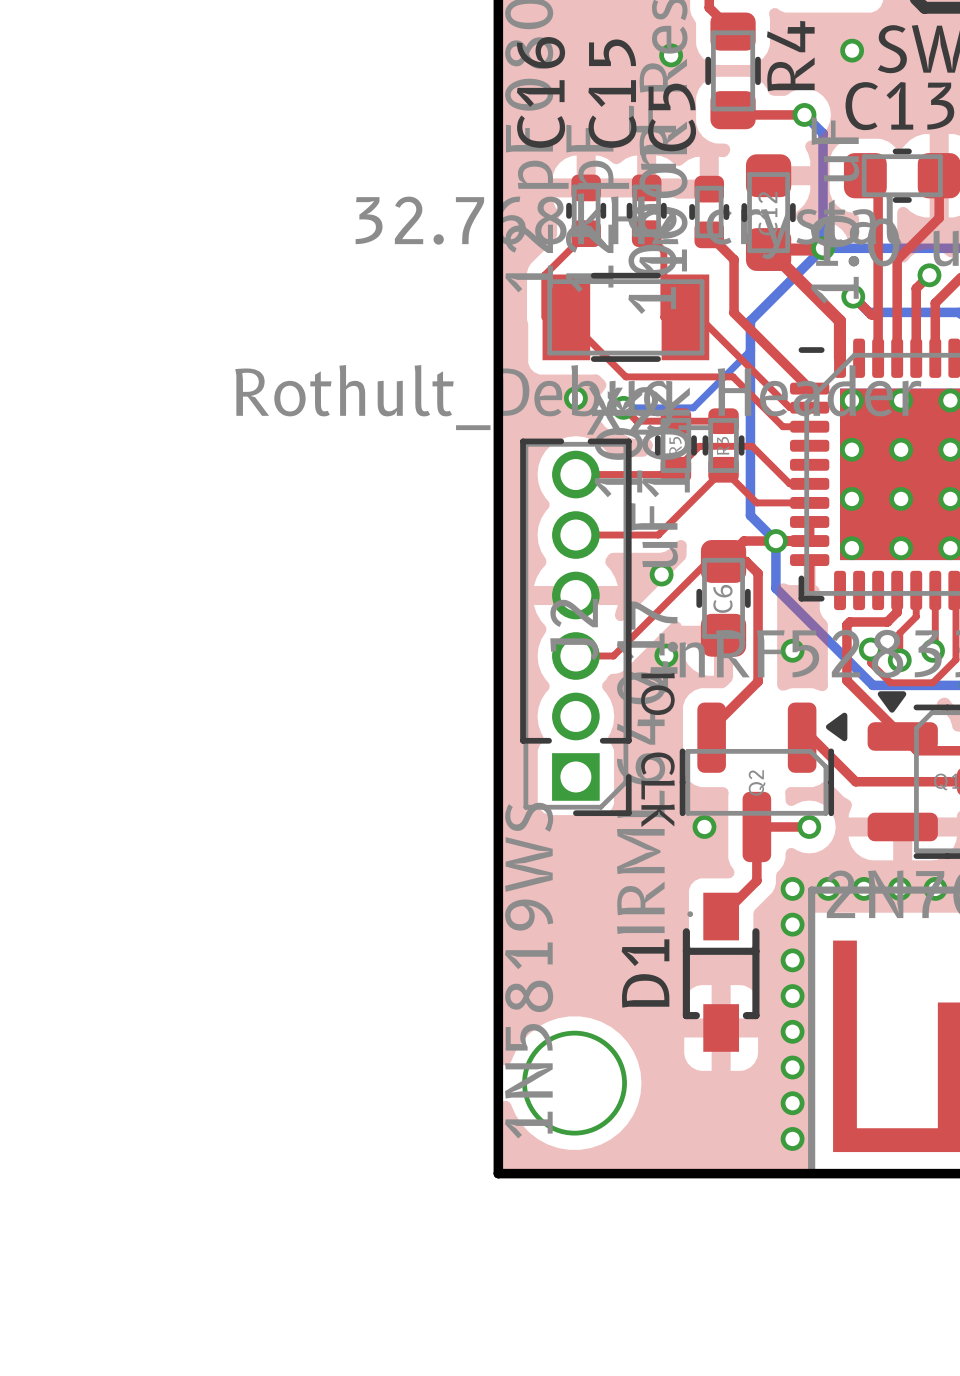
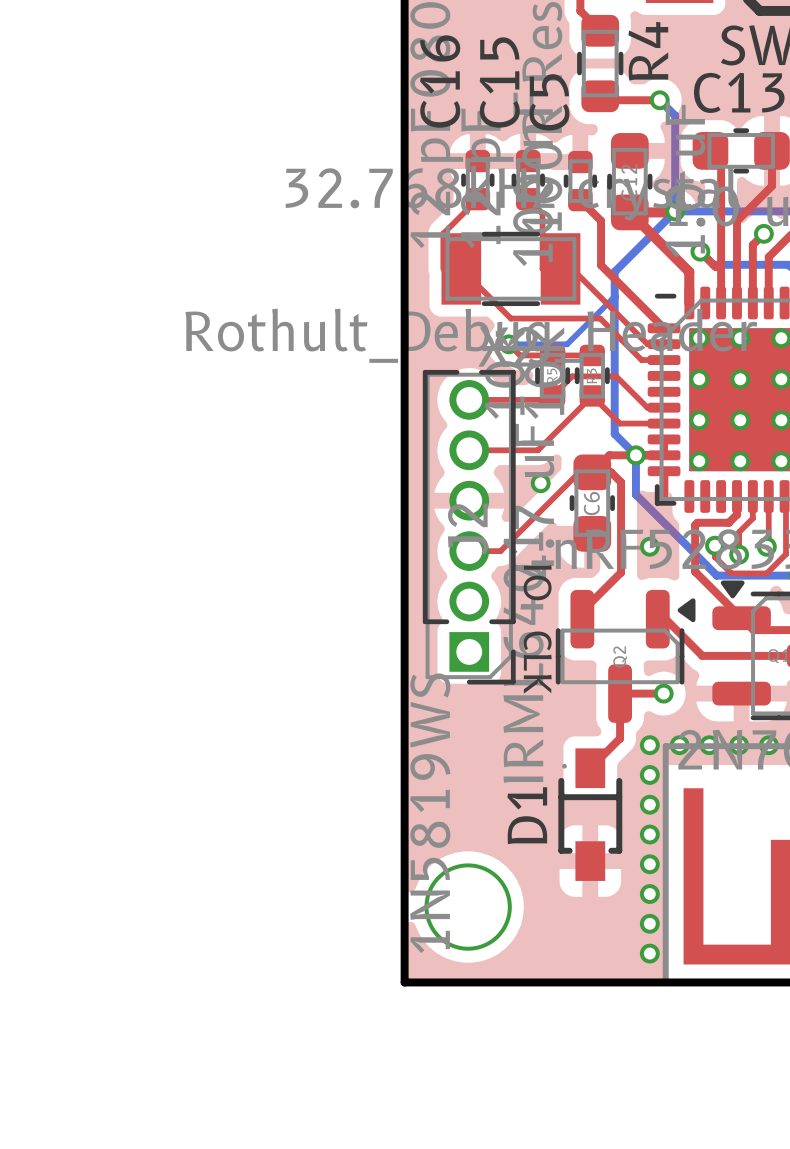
via: (852, 50) -> none
via: (671, 55) -> none
via: (575, 398) -> none
via: (666, 655) -> none
via: (704, 826) -> none

